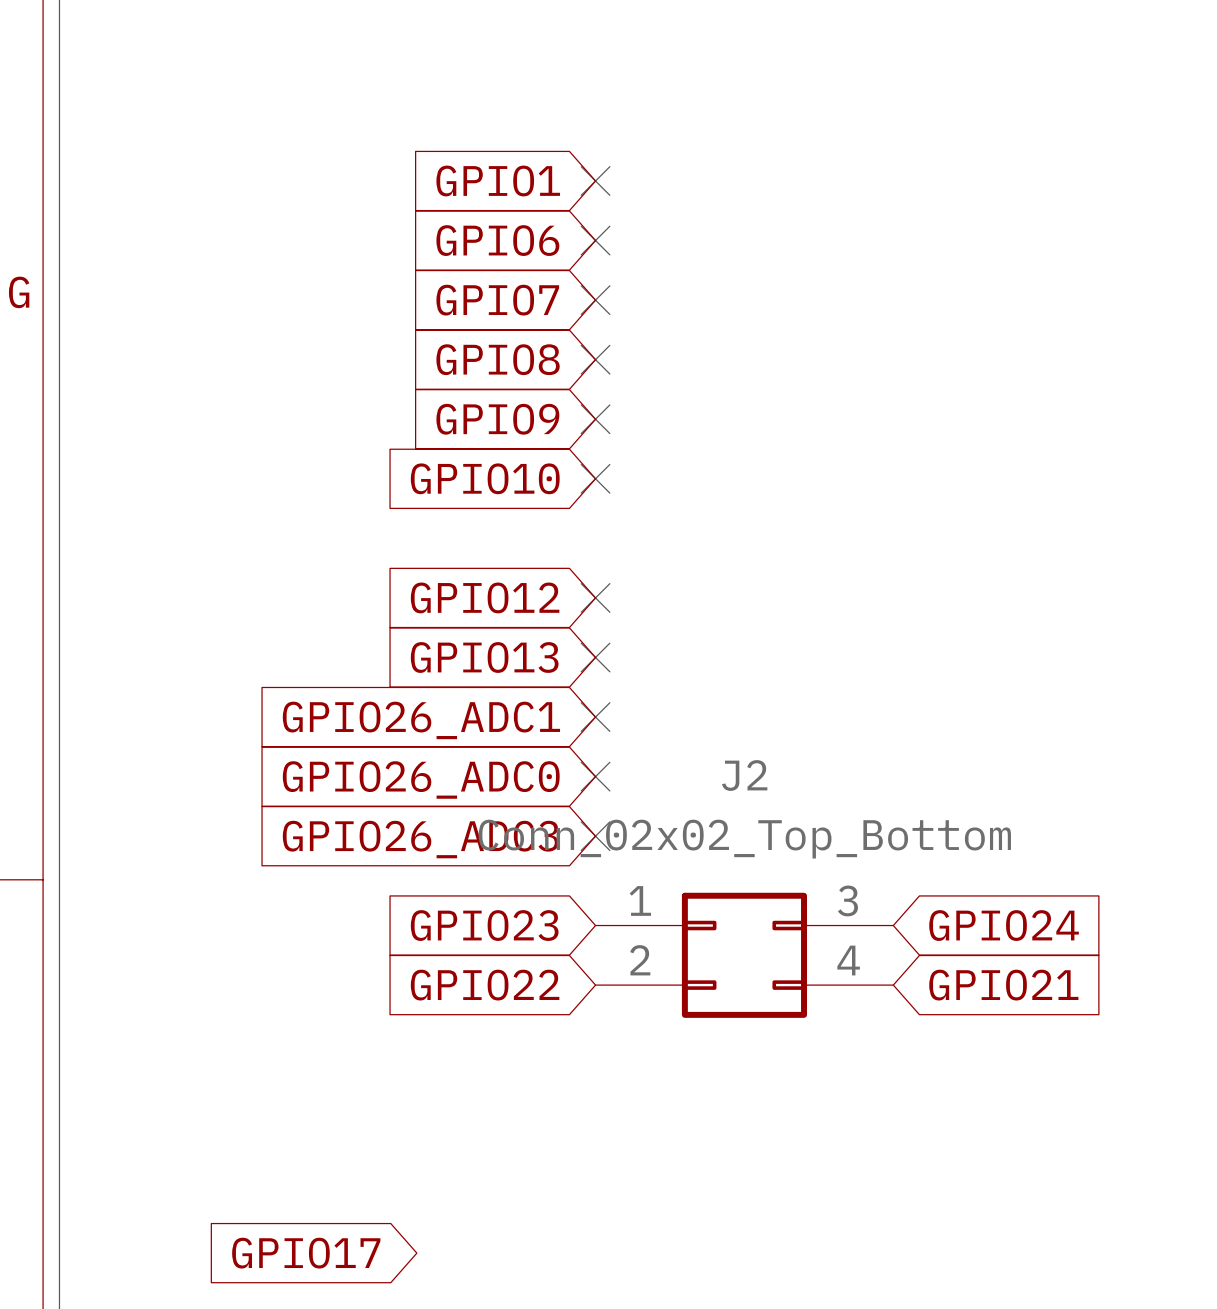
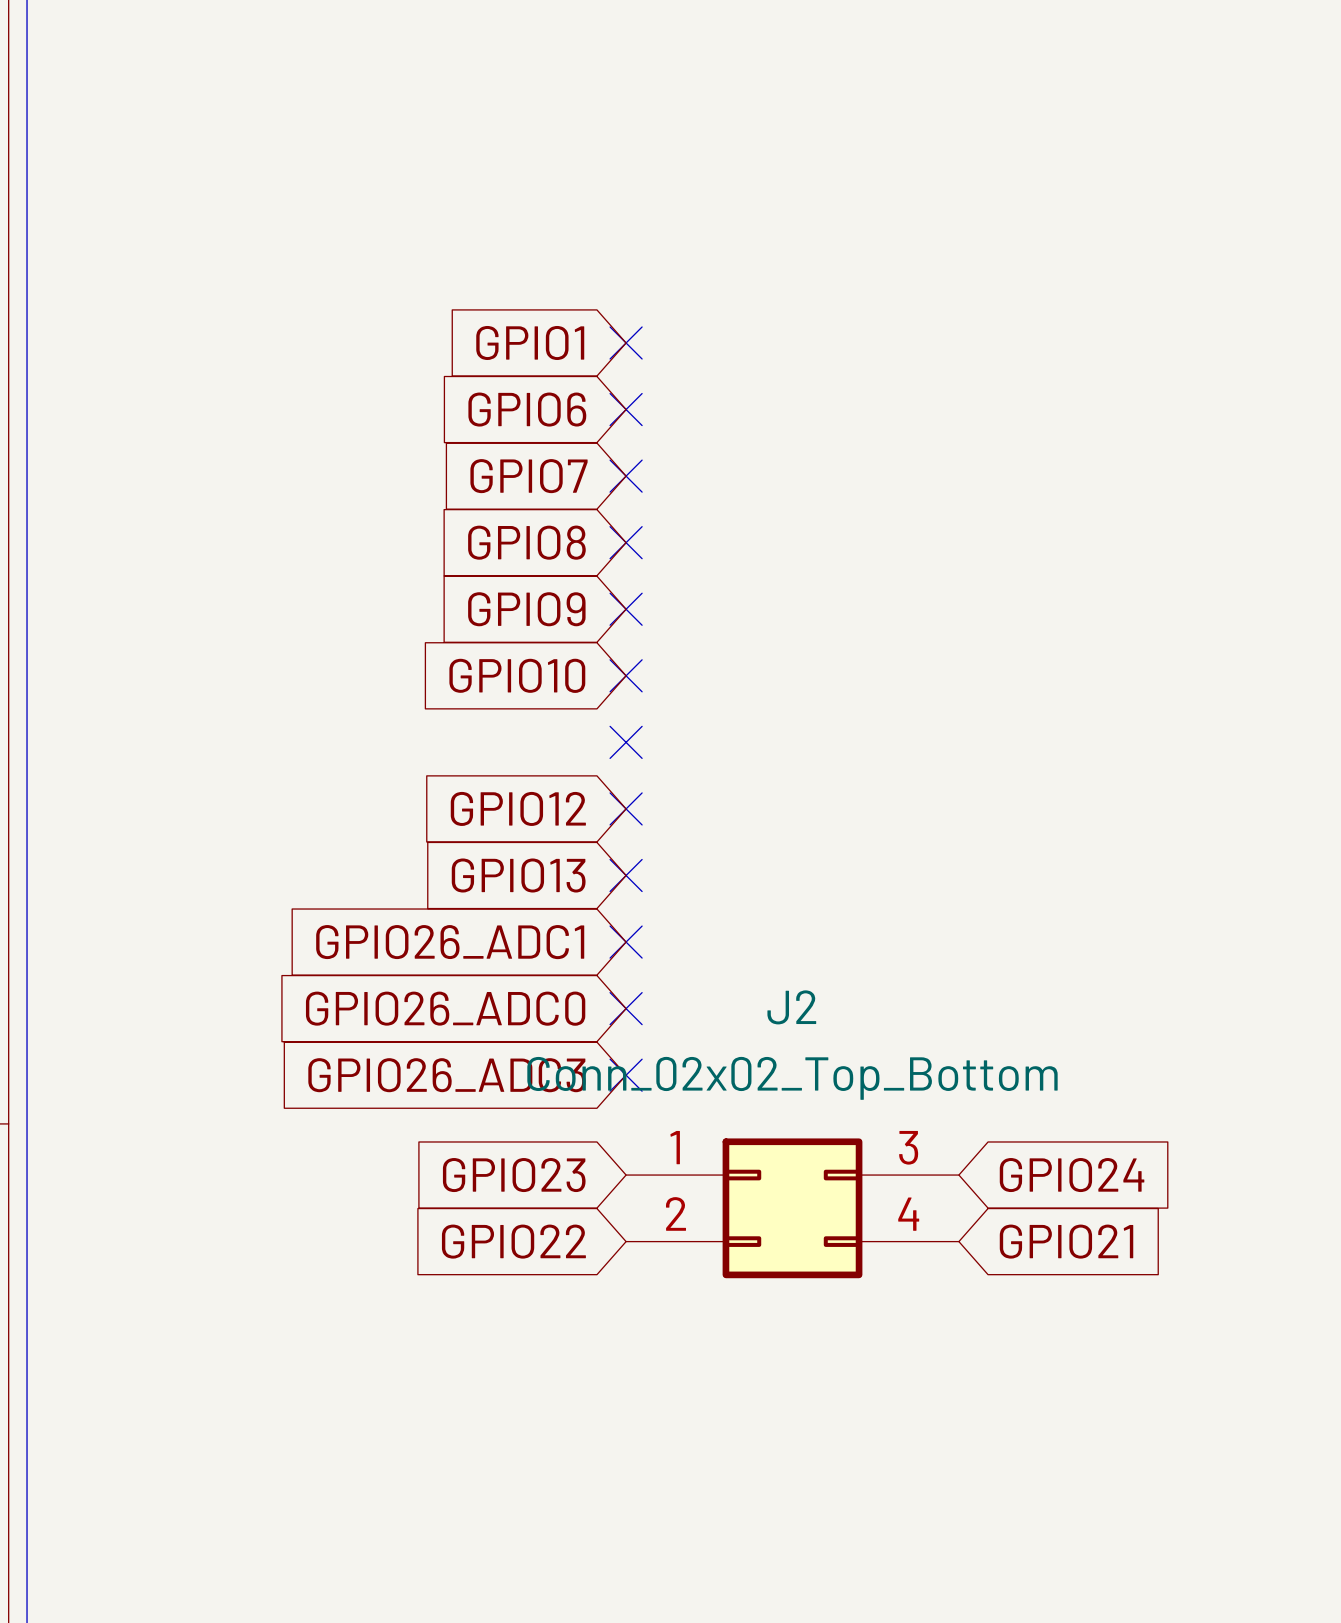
no-connect mark: none -> (626, 742)
global label: GPIO17 (306, 1253) -> none

